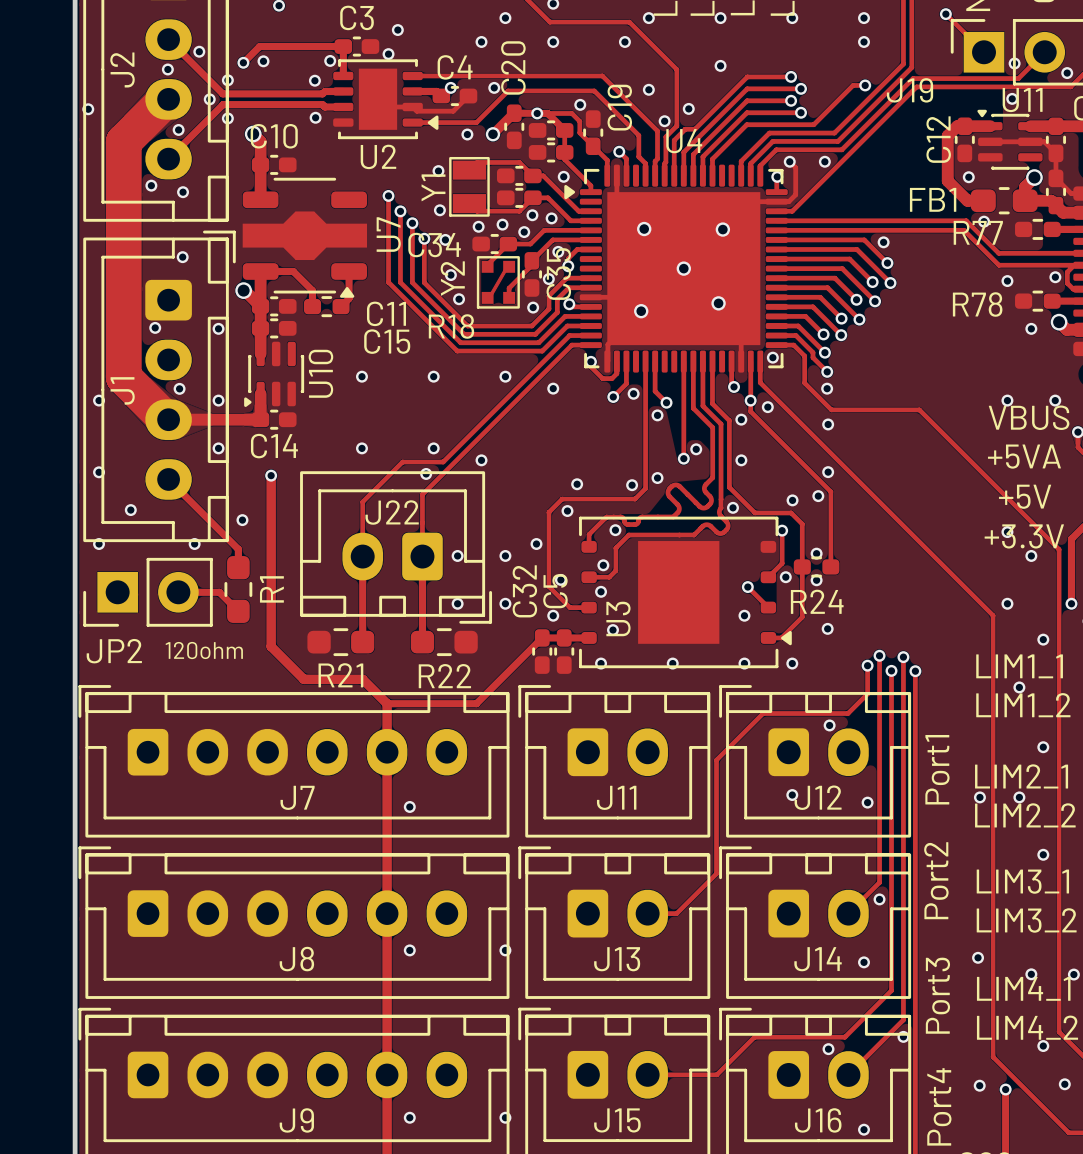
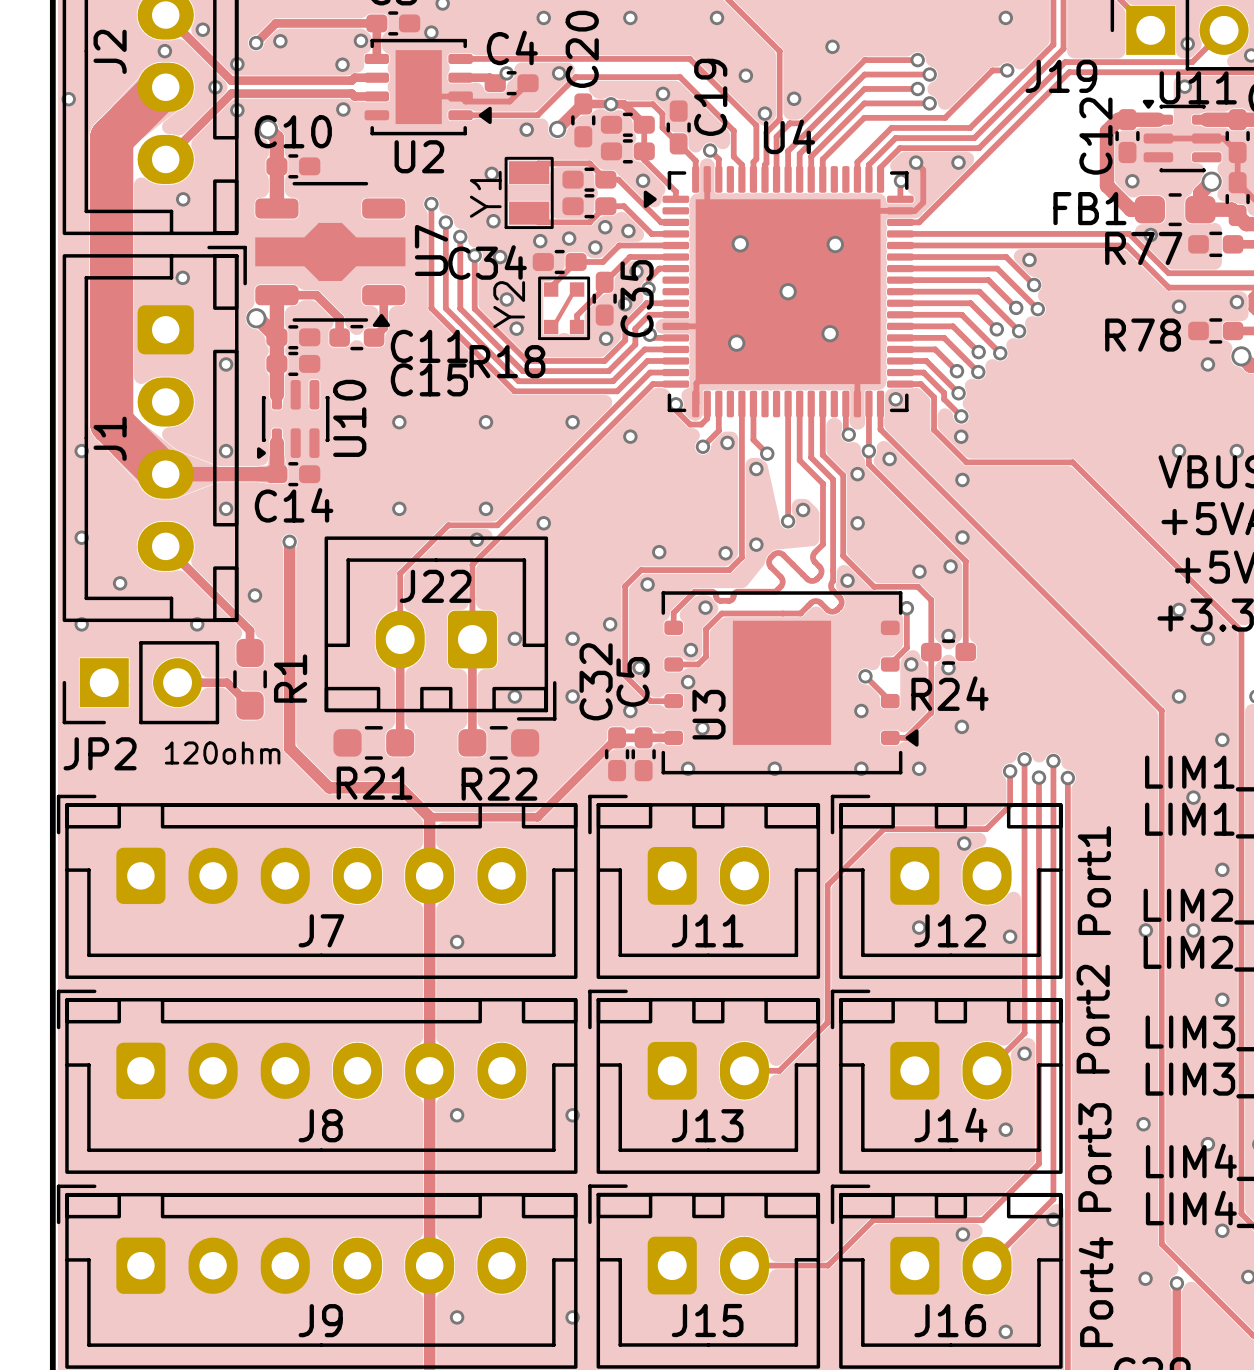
via: (178, 129) -> none
via: (151, 185) -> none
via: (155, 327) -> none
via: (179, 388) -> none

